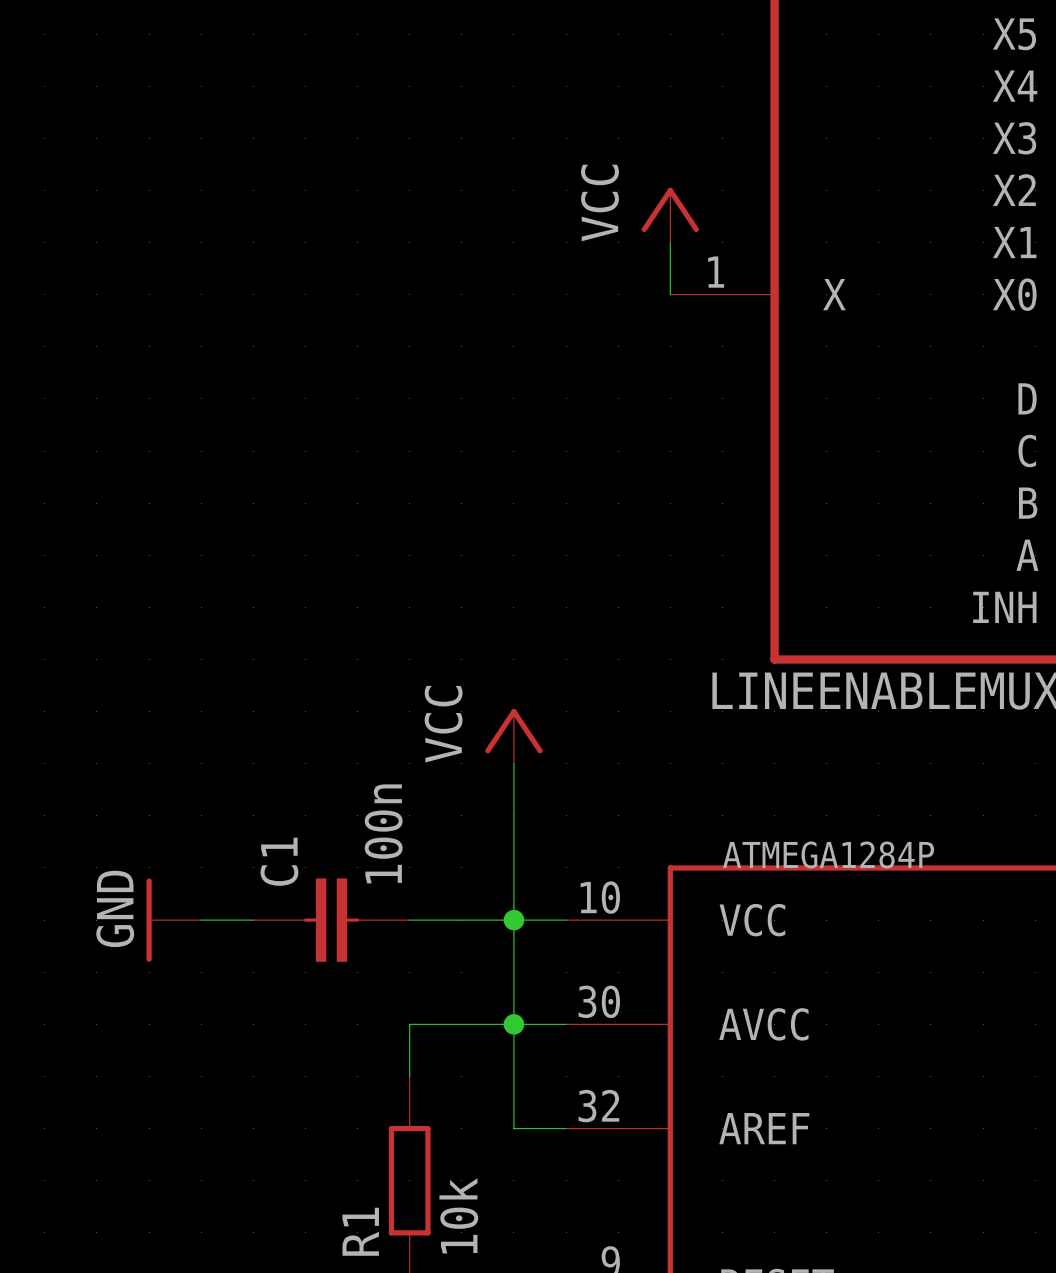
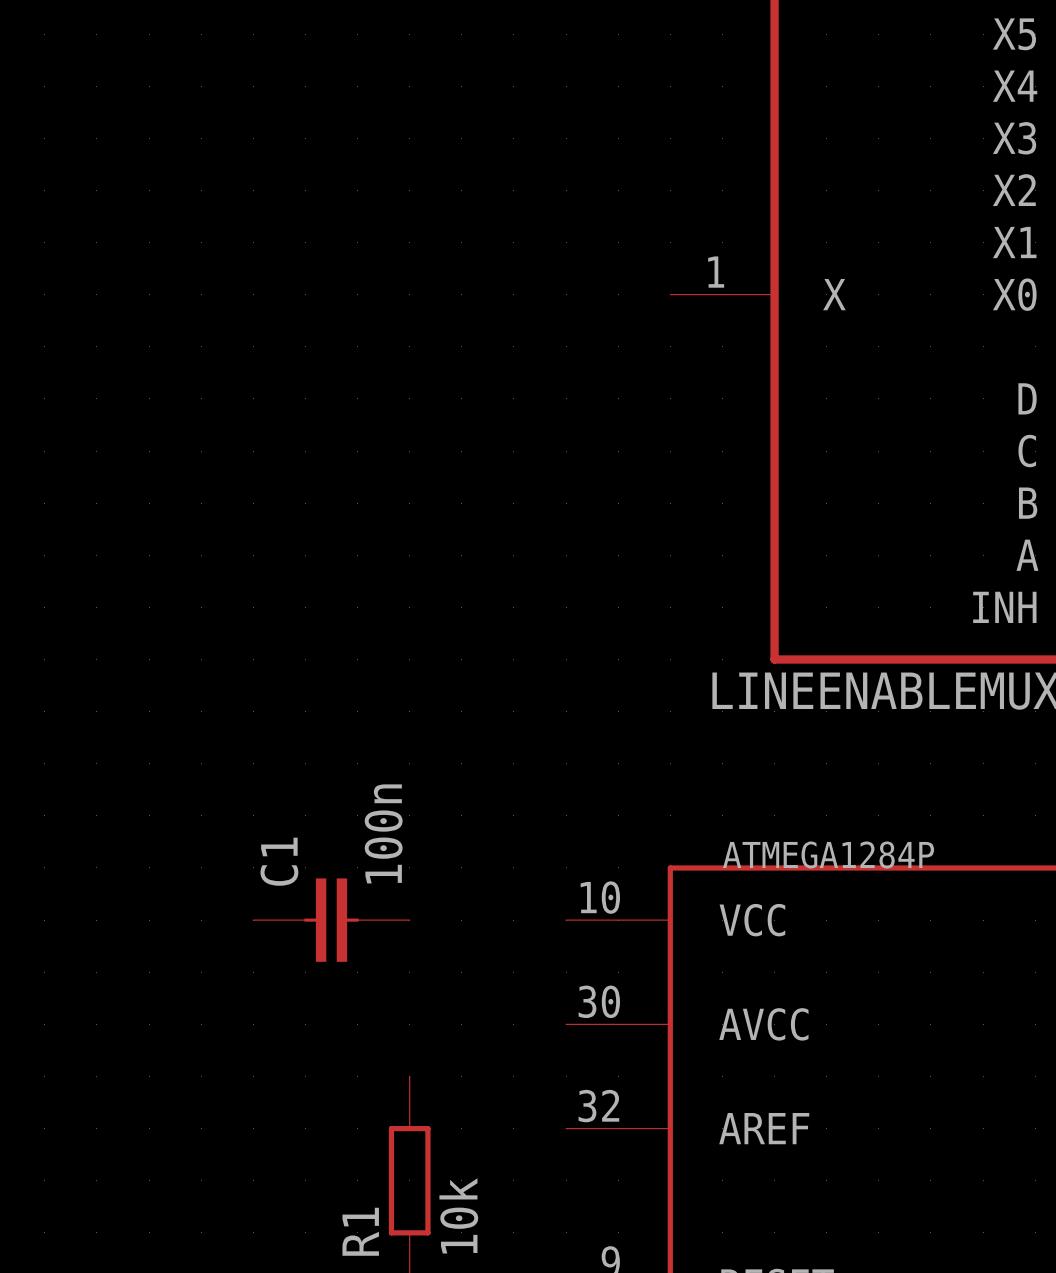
power symbol: VCC (670, 215) -> none
wire: (670, 242) (670, 294) -> none
power symbol: VCC (513, 736) -> none
wire: (513, 763) (513, 1128) (566, 1128) -> none
power symbol: GND (173, 920) -> none
wire: (201, 920) (253, 920) -> none
wire: (409, 920) (566, 920) -> none
junction: (513, 920) -> none
junction: (513, 1024) -> none
wire: (566, 1024) (409, 1024) (409, 1076) -> none

